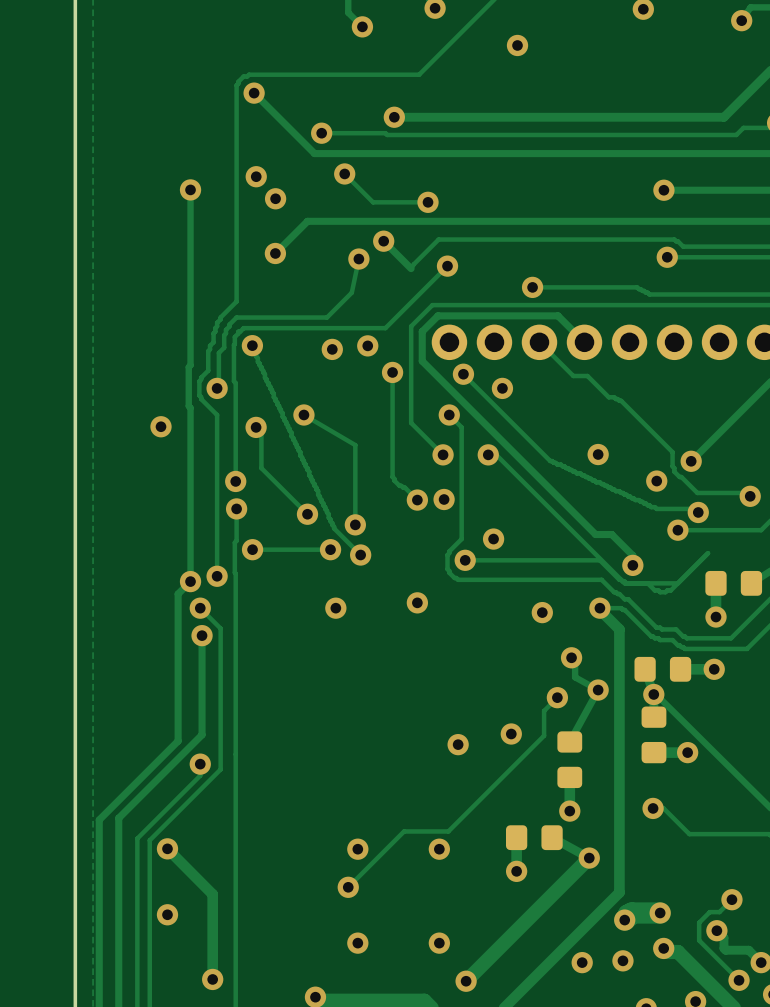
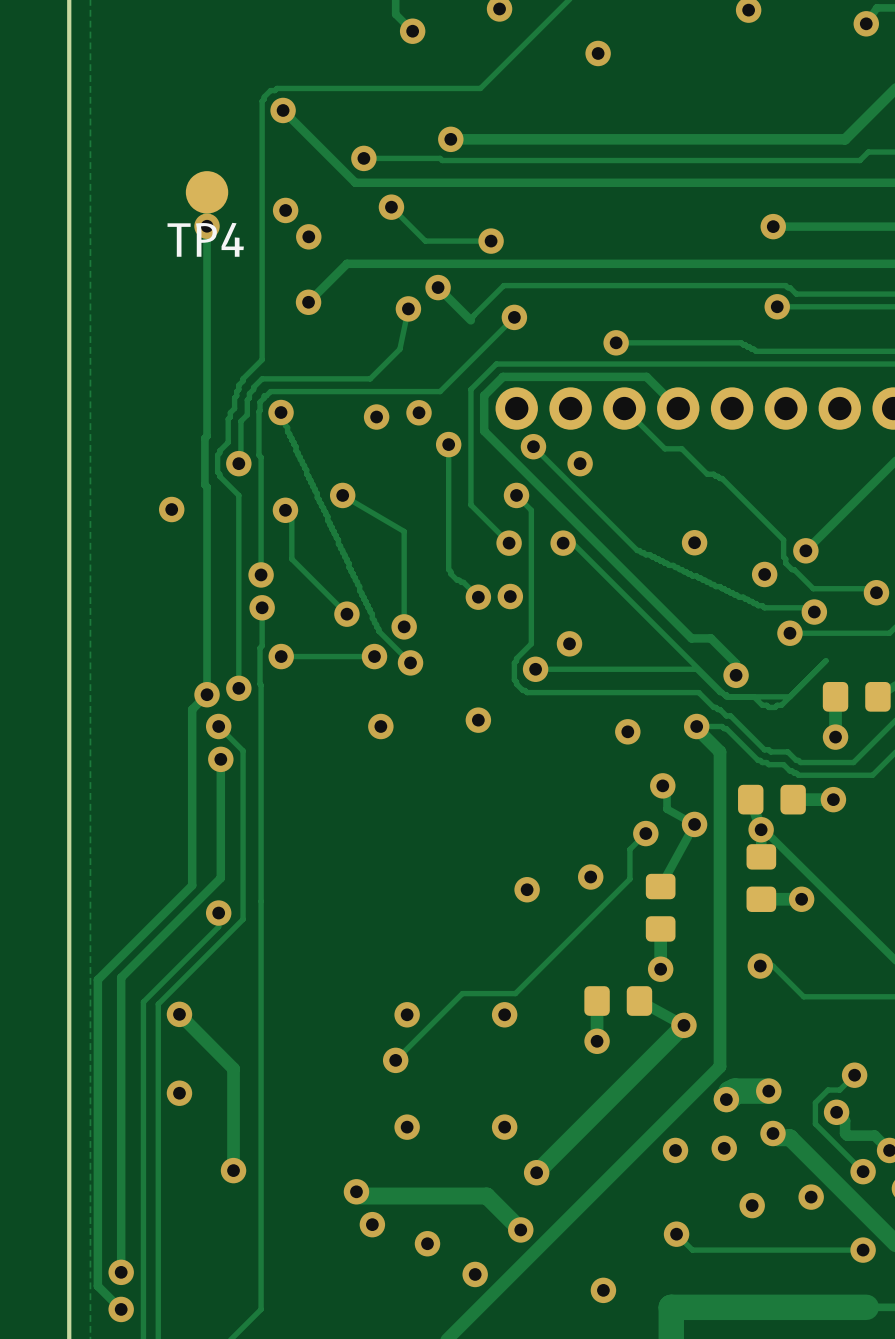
part: none -> (207, 192)
text: none -> TP4 (205, 239)

